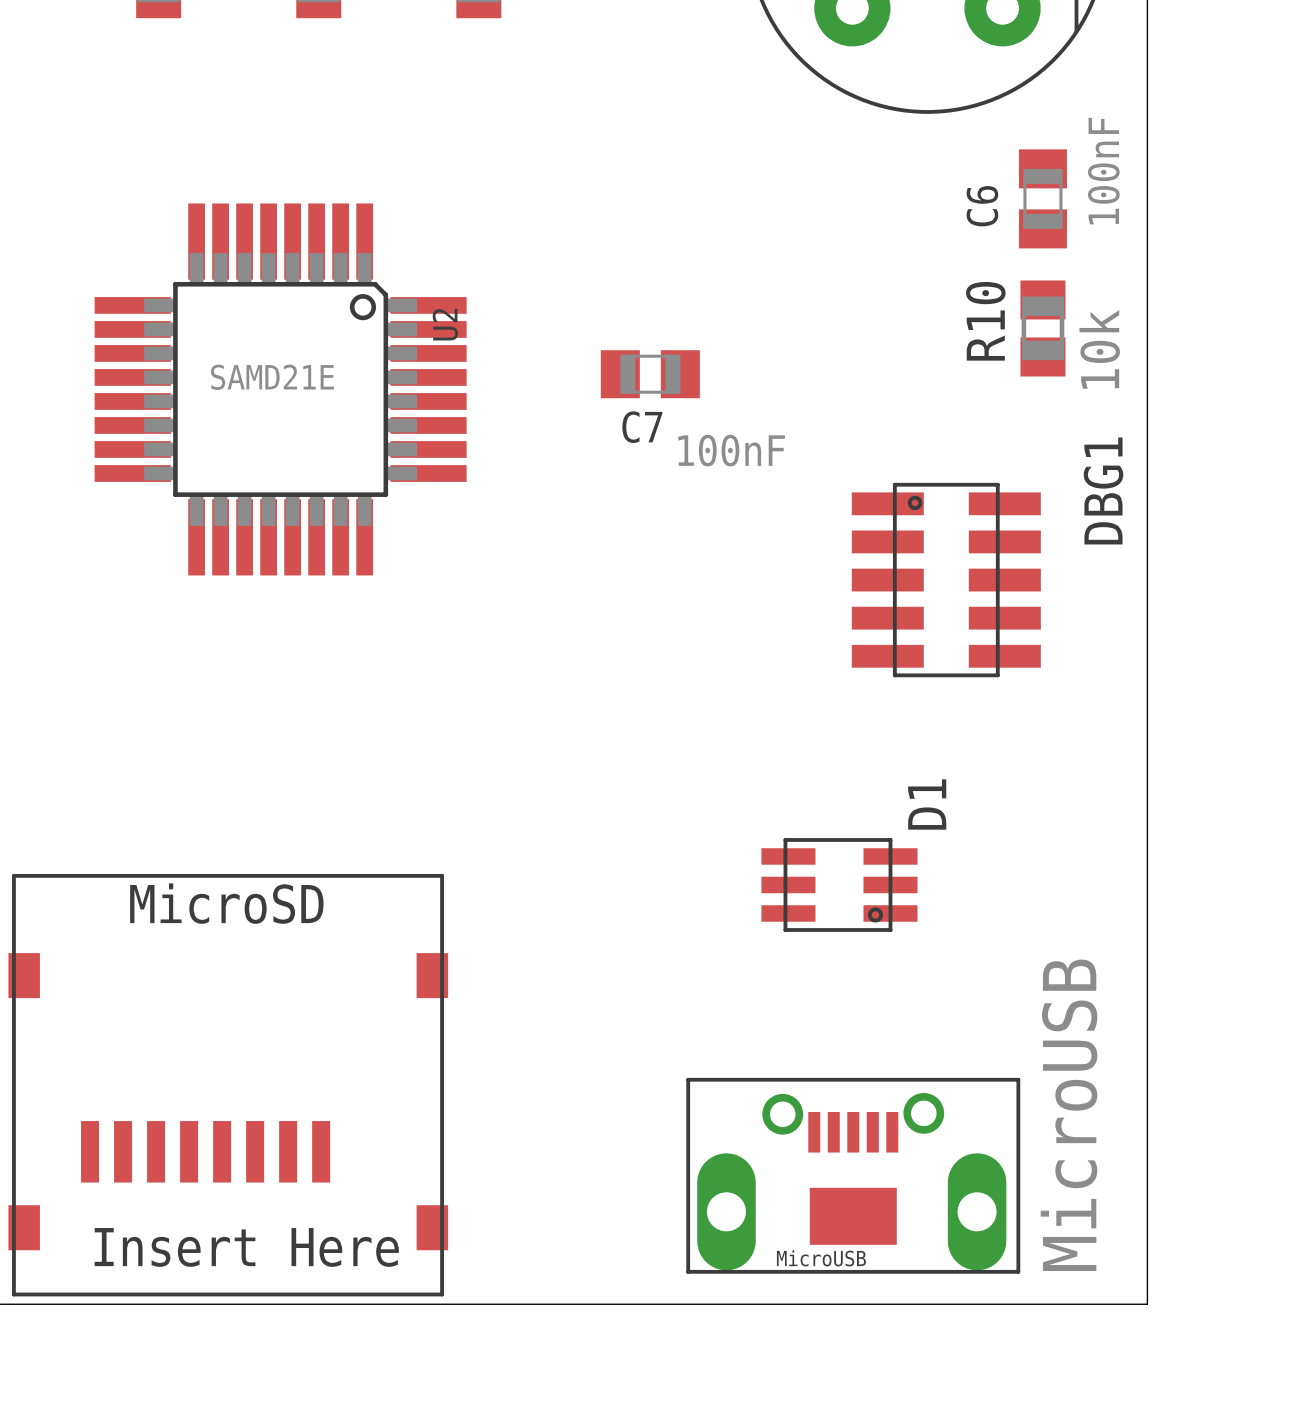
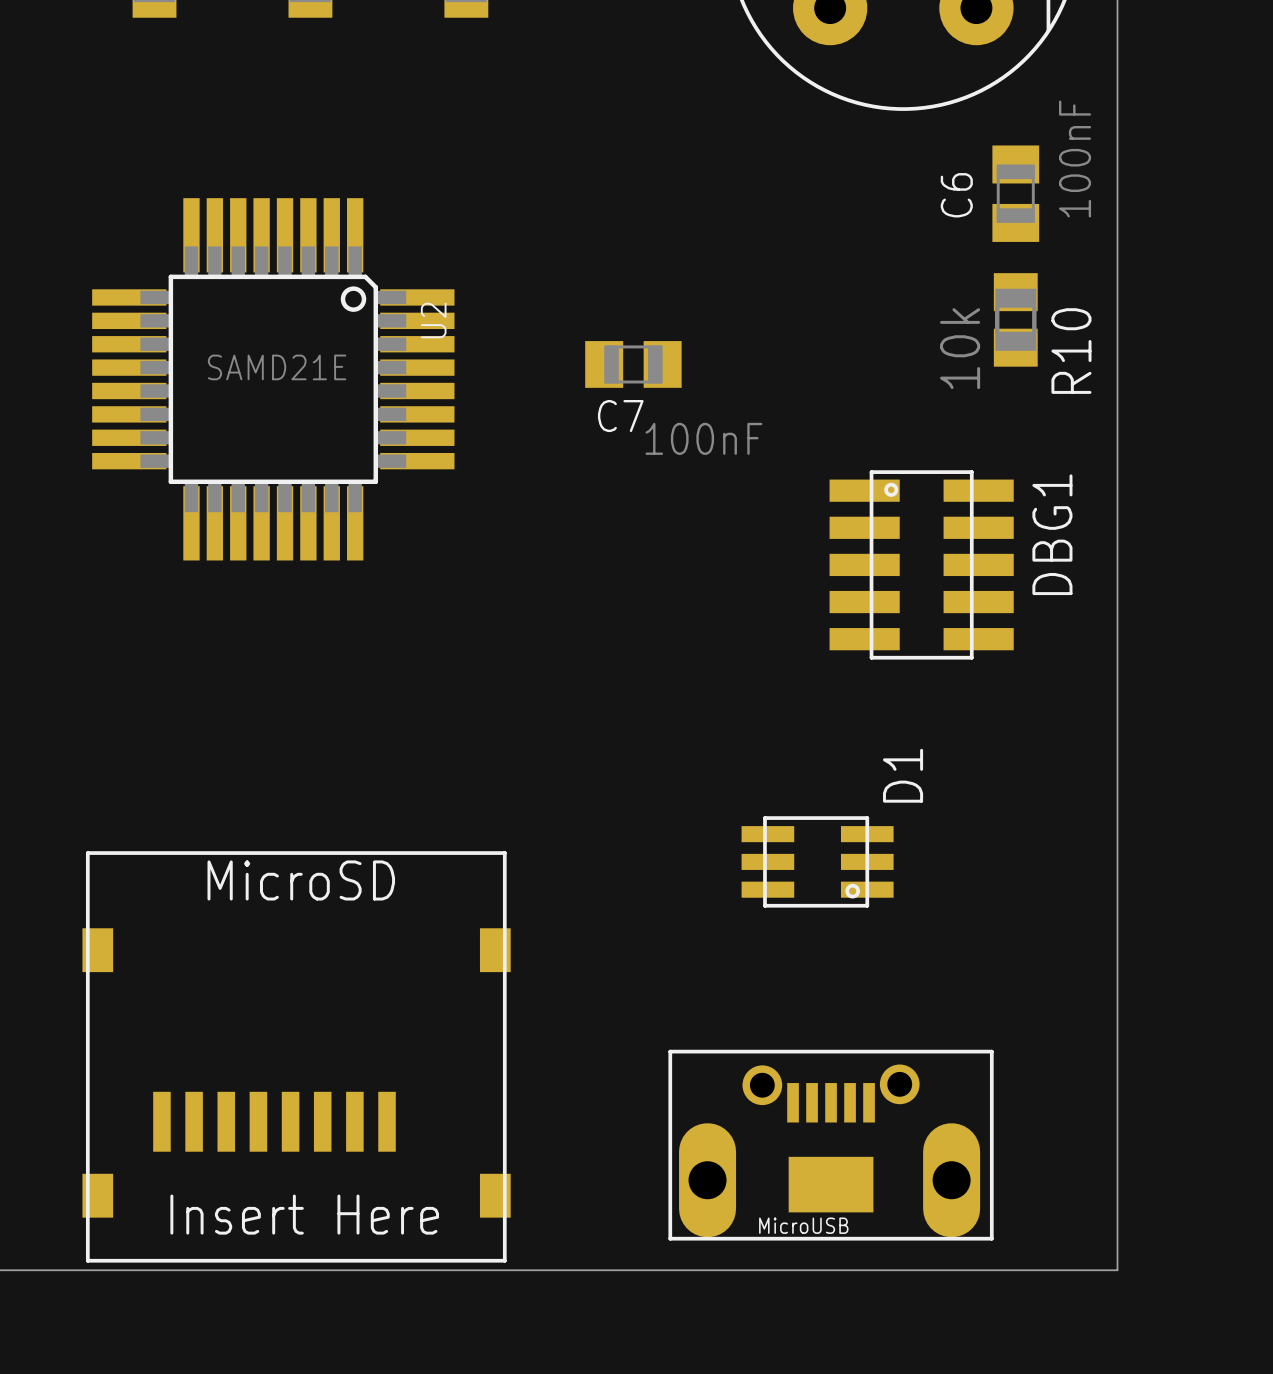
R10 name position: R10 (985, 321) -> R10 (1071, 351)
R10 value position: 10k (1099, 349) -> 10k (960, 348)
DBG1 name position: DBG1 (1103, 490) -> DBG1 (1052, 534)
part position: (228, 1085) -> (296, 1056)
text: MicroUSB (1069, 1115) -> none

